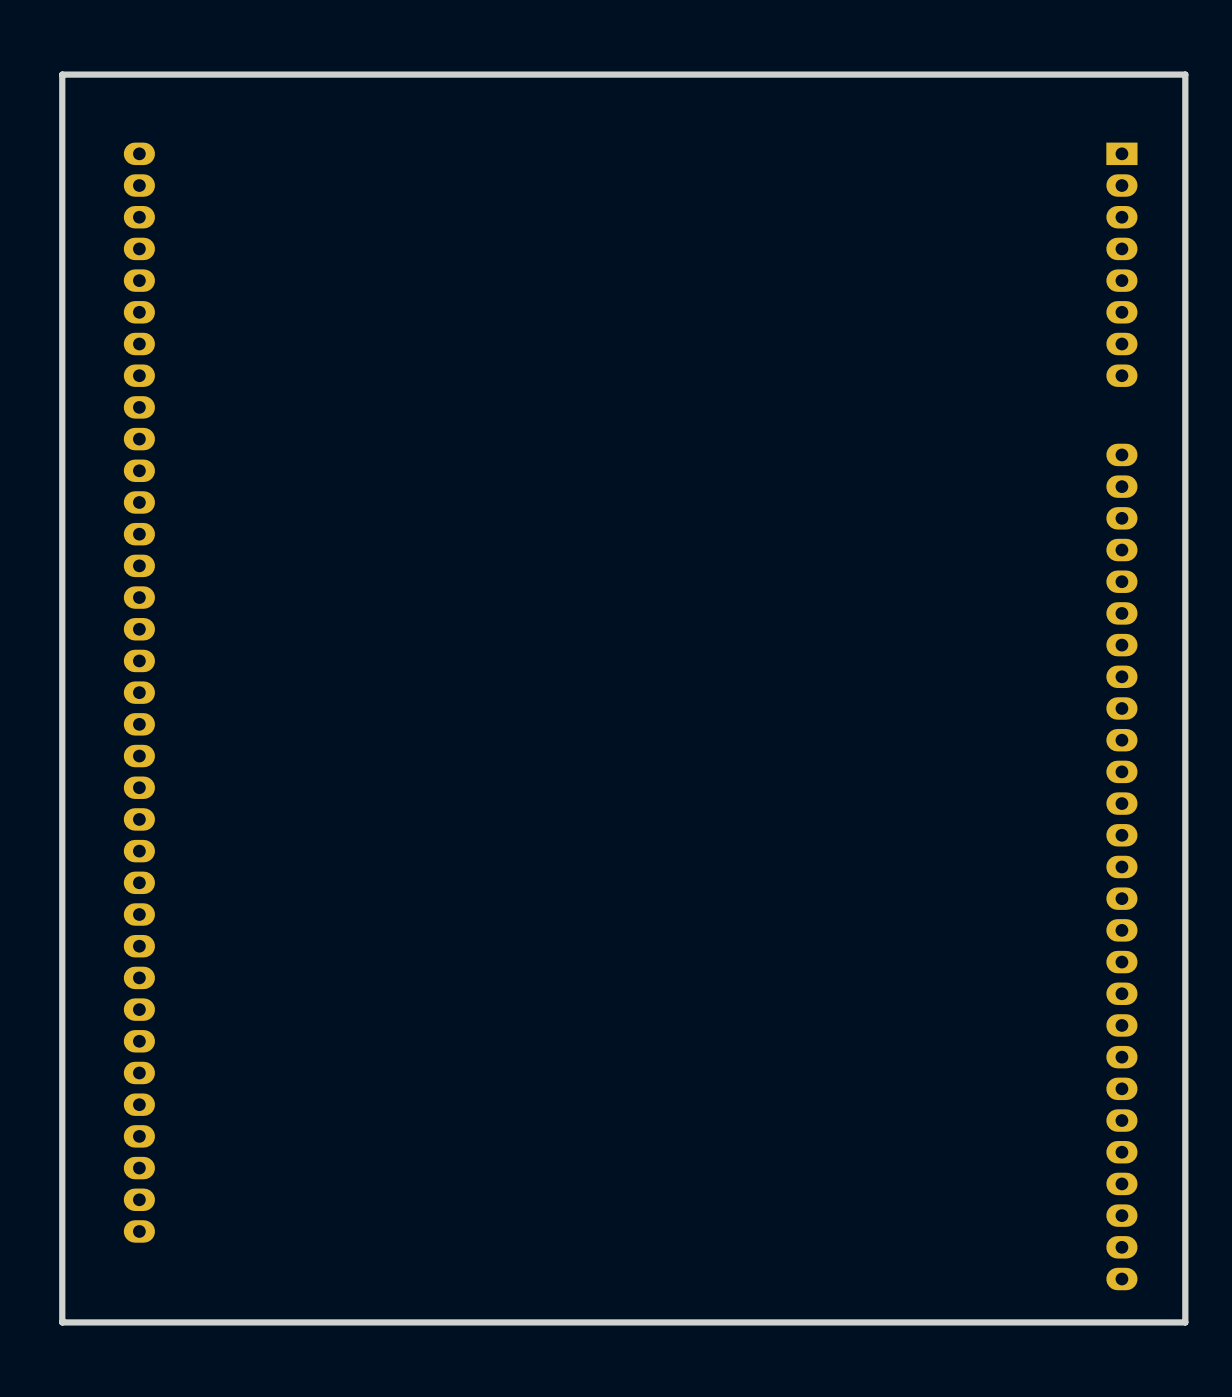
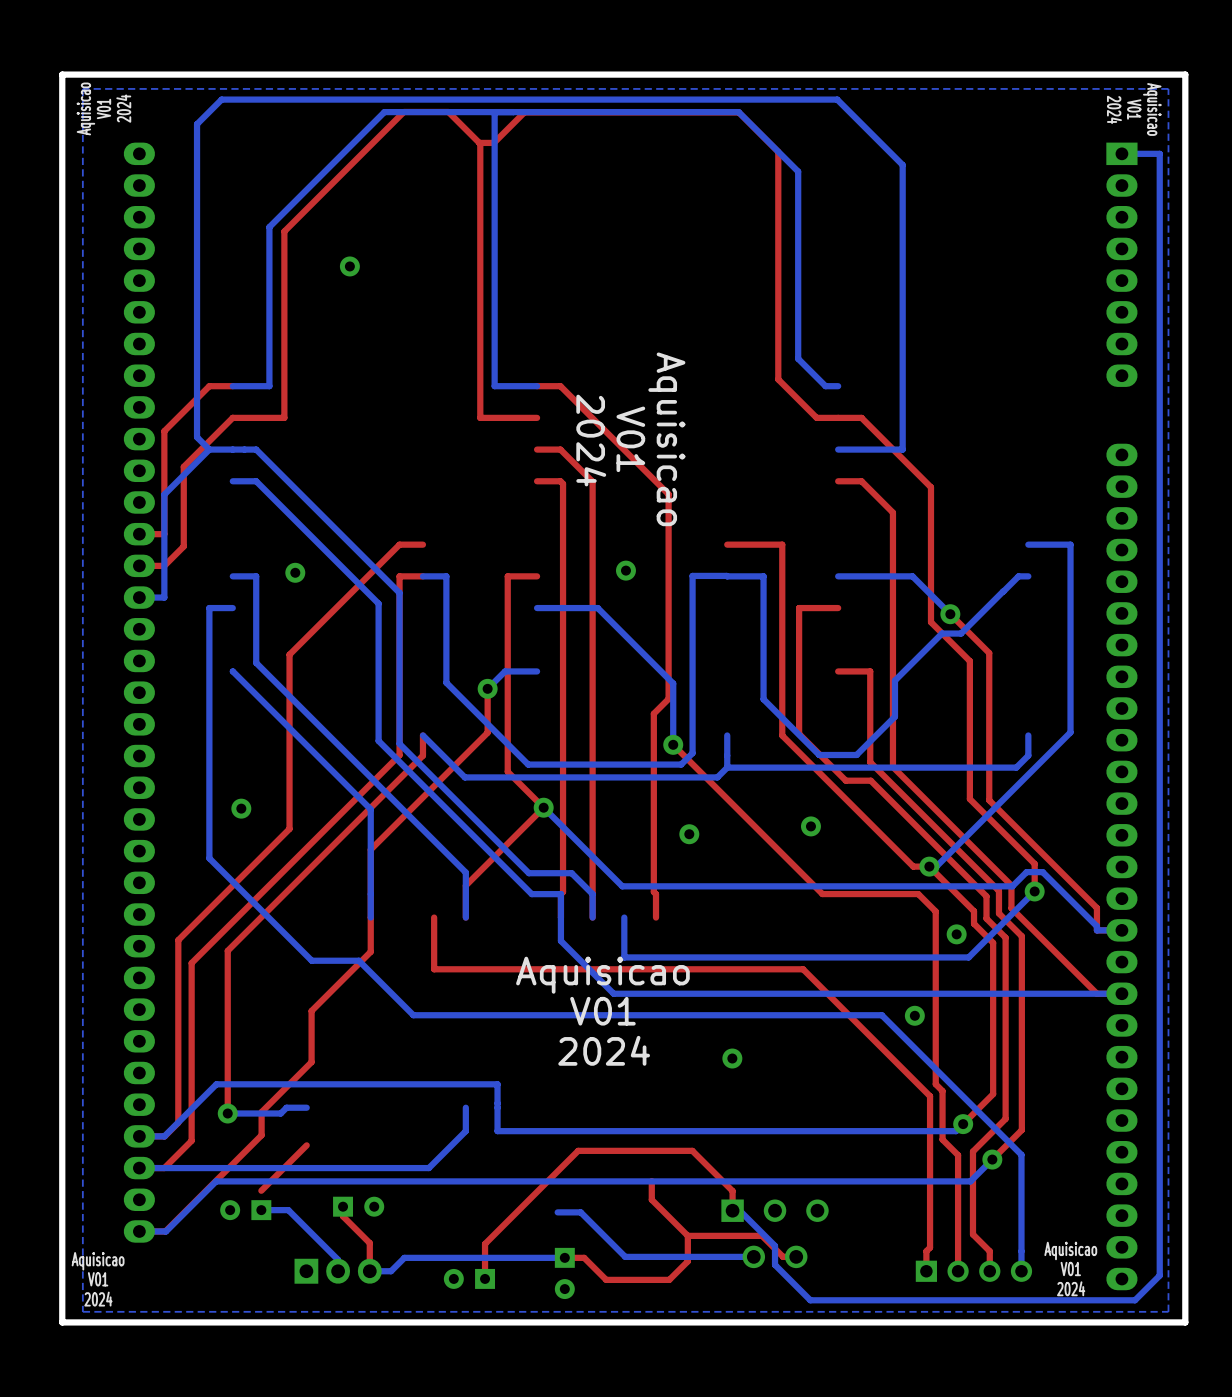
bottom zone outline: none -> (1168, 88) (82, 88) (82, 1311) (1168, 1311) (1168, 88)
text: none -> Aquisicao (85, 108)
text: none -> V01 (103, 108)
text: none -> 2024 (123, 108)
text: none -> 2024 (1114, 109)
text: none -> V01 (1134, 109)
text: none -> Aquisicao (1152, 109)
bottom track: none -> (494, 112) (494, 386) (537, 386)
top track: none -> (479, 142) (493, 142) (524, 112) (738, 112) (778, 151) (778, 379) (816, 417) (861, 417) (930, 487) (930, 622) (969, 661) (969, 799) (1034, 863) (1034, 891)
bottom track: none -> (1121, 153) (1159, 153) (1159, 1275) (1135, 1300) (810, 1300) (775, 1264) (775, 1245) (739, 1210) (732, 1210)
via: none -> (349, 266)
top track: none -> (232, 386) (209, 386) (164, 431) (164, 534) (139, 534)
top track: none -> (537, 386) (560, 386) (668, 494) (668, 698) (653, 713) (653, 891) (656, 894) (656, 917)
bottom track: none -> (838, 386) (825, 386) (798, 358) (798, 171) (738, 112) (384, 112) (269, 227) (269, 386) (232, 386)
top track: none -> (537, 417) (480, 417) (480, 143) (448, 111) (403, 111) (284, 231) (284, 417) (232, 417) (183, 466) (183, 546) (164, 565) (139, 565)
text: none -> V01 (630, 439)
text: none -> Aquisicao (666, 439)
text: none -> 2024 (591, 440)
bottom track: none -> (209, 449) (256, 449) (399, 592) (399, 743) (528, 873) (571, 873) (592, 894) (592, 917)
bottom track: none -> (209, 449) (164, 494) (164, 597) (139, 597)
top track: none -> (537, 449) (560, 449) (592, 481) (592, 917)
bottom track: none -> (838, 449) (902, 449) (902, 165) (837, 99) (221, 99) (197, 124) (197, 437) (209, 449)
bottom track: none -> (232, 481) (256, 481) (378, 603) (378, 740) (531, 894) (560, 894) (560, 940) (613, 993) (1121, 993)
top track: none -> (537, 481) (560, 481) (563, 483) (563, 892) (560, 894) (560, 917)
top track: none -> (838, 481) (861, 481) (892, 512) (892, 767) (1011, 885) (1011, 908) (1096, 993) (1121, 993)
top track: none -> (422, 544) (399, 544) (289, 654) (289, 828) (178, 940) (178, 1122) (164, 1136) (139, 1136)
top track: none -> (727, 544) (782, 544) (782, 735) (913, 866) (929, 866) (974, 911) (974, 923) (993, 942) (993, 1094) (963, 1124)
bottom track: none -> (1028, 544) (1070, 544) (1070, 732) (936, 866) (929, 866)
via: none -> (625, 570)
via: none -> (295, 572)
bottom track: none -> (232, 576) (256, 576) (256, 662) (465, 872) (465, 917)
top track: none -> (422, 576) (399, 576) (399, 755) (191, 963) (191, 1140) (164, 1168) (139, 1168)
top track: none -> (537, 576) (507, 576) (507, 771) (543, 807) (465, 885) (465, 917)
bottom track: none -> (838, 576) (912, 576) (950, 614)
bottom track: none -> (1028, 576) (1018, 576) (961, 633) (941, 633) (894, 680) (894, 716) (856, 754) (819, 754) (763, 699) (763, 576) (692, 575) (692, 753) (681, 764) (528, 764) (446, 682) (446, 576) (422, 576)
bottom track: none -> (232, 608) (209, 608) (209, 858) (311, 960) (358, 960) (413, 1015) (881, 1015) (1021, 1154) (1021, 1271)
bottom track: none -> (537, 608) (597, 608) (673, 683) (673, 744)
top track: none -> (838, 608) (799, 608) (799, 733) (845, 780) (870, 780) (986, 896) (986, 918) (1005, 937) (1005, 1118) (972, 1151) (972, 1234) (989, 1251) (989, 1271)
top track: none -> (950, 614) (989, 653) (989, 800) (1096, 908) (1096, 930) (1121, 930)
via: none -> (950, 614)
bottom track: none -> (232, 671) (370, 809) (370, 917)
bottom track: none -> (537, 671) (505, 671) (487, 688)
top track: none -> (838, 671) (870, 671) (870, 762) (998, 890) (998, 913) (1021, 936) (1021, 1130) (992, 1159)
top track: none -> (487, 688) (487, 732) (370, 849) (370, 951) (311, 1011) (311, 1062) (261, 1112) (261, 1135) (165, 1231) (139, 1231)
via: none -> (487, 688)
top track: none -> (422, 735) (422, 755) (227, 950) (227, 1113)
bottom track: none -> (422, 735) (464, 777) (717, 777) (727, 767)
bottom track: none -> (727, 735) (727, 767)
bottom track: none -> (1028, 735) (1028, 755) (1016, 767) (727, 767)
top track: none -> (673, 744) (822, 894) (918, 894) (935, 911) (935, 1084) (942, 1091) (942, 1139) (958, 1155) (958, 1271)
via: none -> (673, 744)
bottom track: none -> (543, 807) (622, 886) (1012, 886) (1026, 872) (1042, 872) (1096, 926) (1096, 930) (1121, 930)
via: none -> (543, 807)
via: none -> (241, 808)
via: none -> (810, 826)
via: none -> (689, 834)
via: none -> (929, 866)
bottom track: none -> (1034, 891) (968, 957) (624, 957) (624, 917)
via: none -> (1034, 891)
top track: none -> (434, 917) (434, 969) (803, 969) (930, 1096) (930, 1247) (926, 1251) (926, 1271)
via: none -> (956, 934)
text: none -> Aquisicao (602, 975)
text: none -> V01 (602, 1011)
via: none -> (914, 1015)
text: none -> 2024 (604, 1050)
via: none -> (732, 1058)
bottom track: none -> (306, 1107) (286, 1107) (280, 1113) (227, 1113)
bottom track: none -> (465, 1107) (465, 1131) (428, 1168) (139, 1168)
via: none -> (227, 1113)
bottom track: none -> (963, 1124) (956, 1131) (497, 1131) (497, 1084) (216, 1084) (164, 1136) (139, 1136)
via: none -> (963, 1124)
top track: none -> (306, 1145) (261, 1190)
bottom track: none -> (992, 1159) (970, 1181) (216, 1181) (166, 1231) (139, 1231)
via: none -> (992, 1159)
top track: none -> (651, 1181) (651, 1199) (687, 1235)
top track: none -> (343, 1206) (343, 1216) (369, 1243) (369, 1271)
part: none -> (358, 1206)
part: none -> (245, 1210)
bottom track: none -> (261, 1210) (288, 1210) (338, 1259) (338, 1271)
top track: none -> (732, 1210) (732, 1191) (692, 1150) (578, 1150) (485, 1243) (485, 1278)
bottom track: none -> (557, 1212) (580, 1212) (625, 1256) (753, 1256)
part: none -> (775, 1233)
top track: none -> (687, 1235) (762, 1235) (783, 1256) (796, 1256)
top track: none -> (687, 1235) (687, 1261) (669, 1279) (606, 1279) (584, 1257) (564, 1257)
text: none -> Aquisicao (1070, 1250)
bottom track: none -> (564, 1257) (404, 1257) (391, 1271) (369, 1271)
text: none -> Aquisicao (98, 1261)
text: none -> V01 (1070, 1269)
part: none -> (338, 1271)
part: none -> (973, 1271)
part: none -> (564, 1273)
part: none -> (469, 1278)
text: none -> V01 (98, 1279)
text: none -> 2024 (1071, 1288)
text: none -> 2024 (98, 1299)

